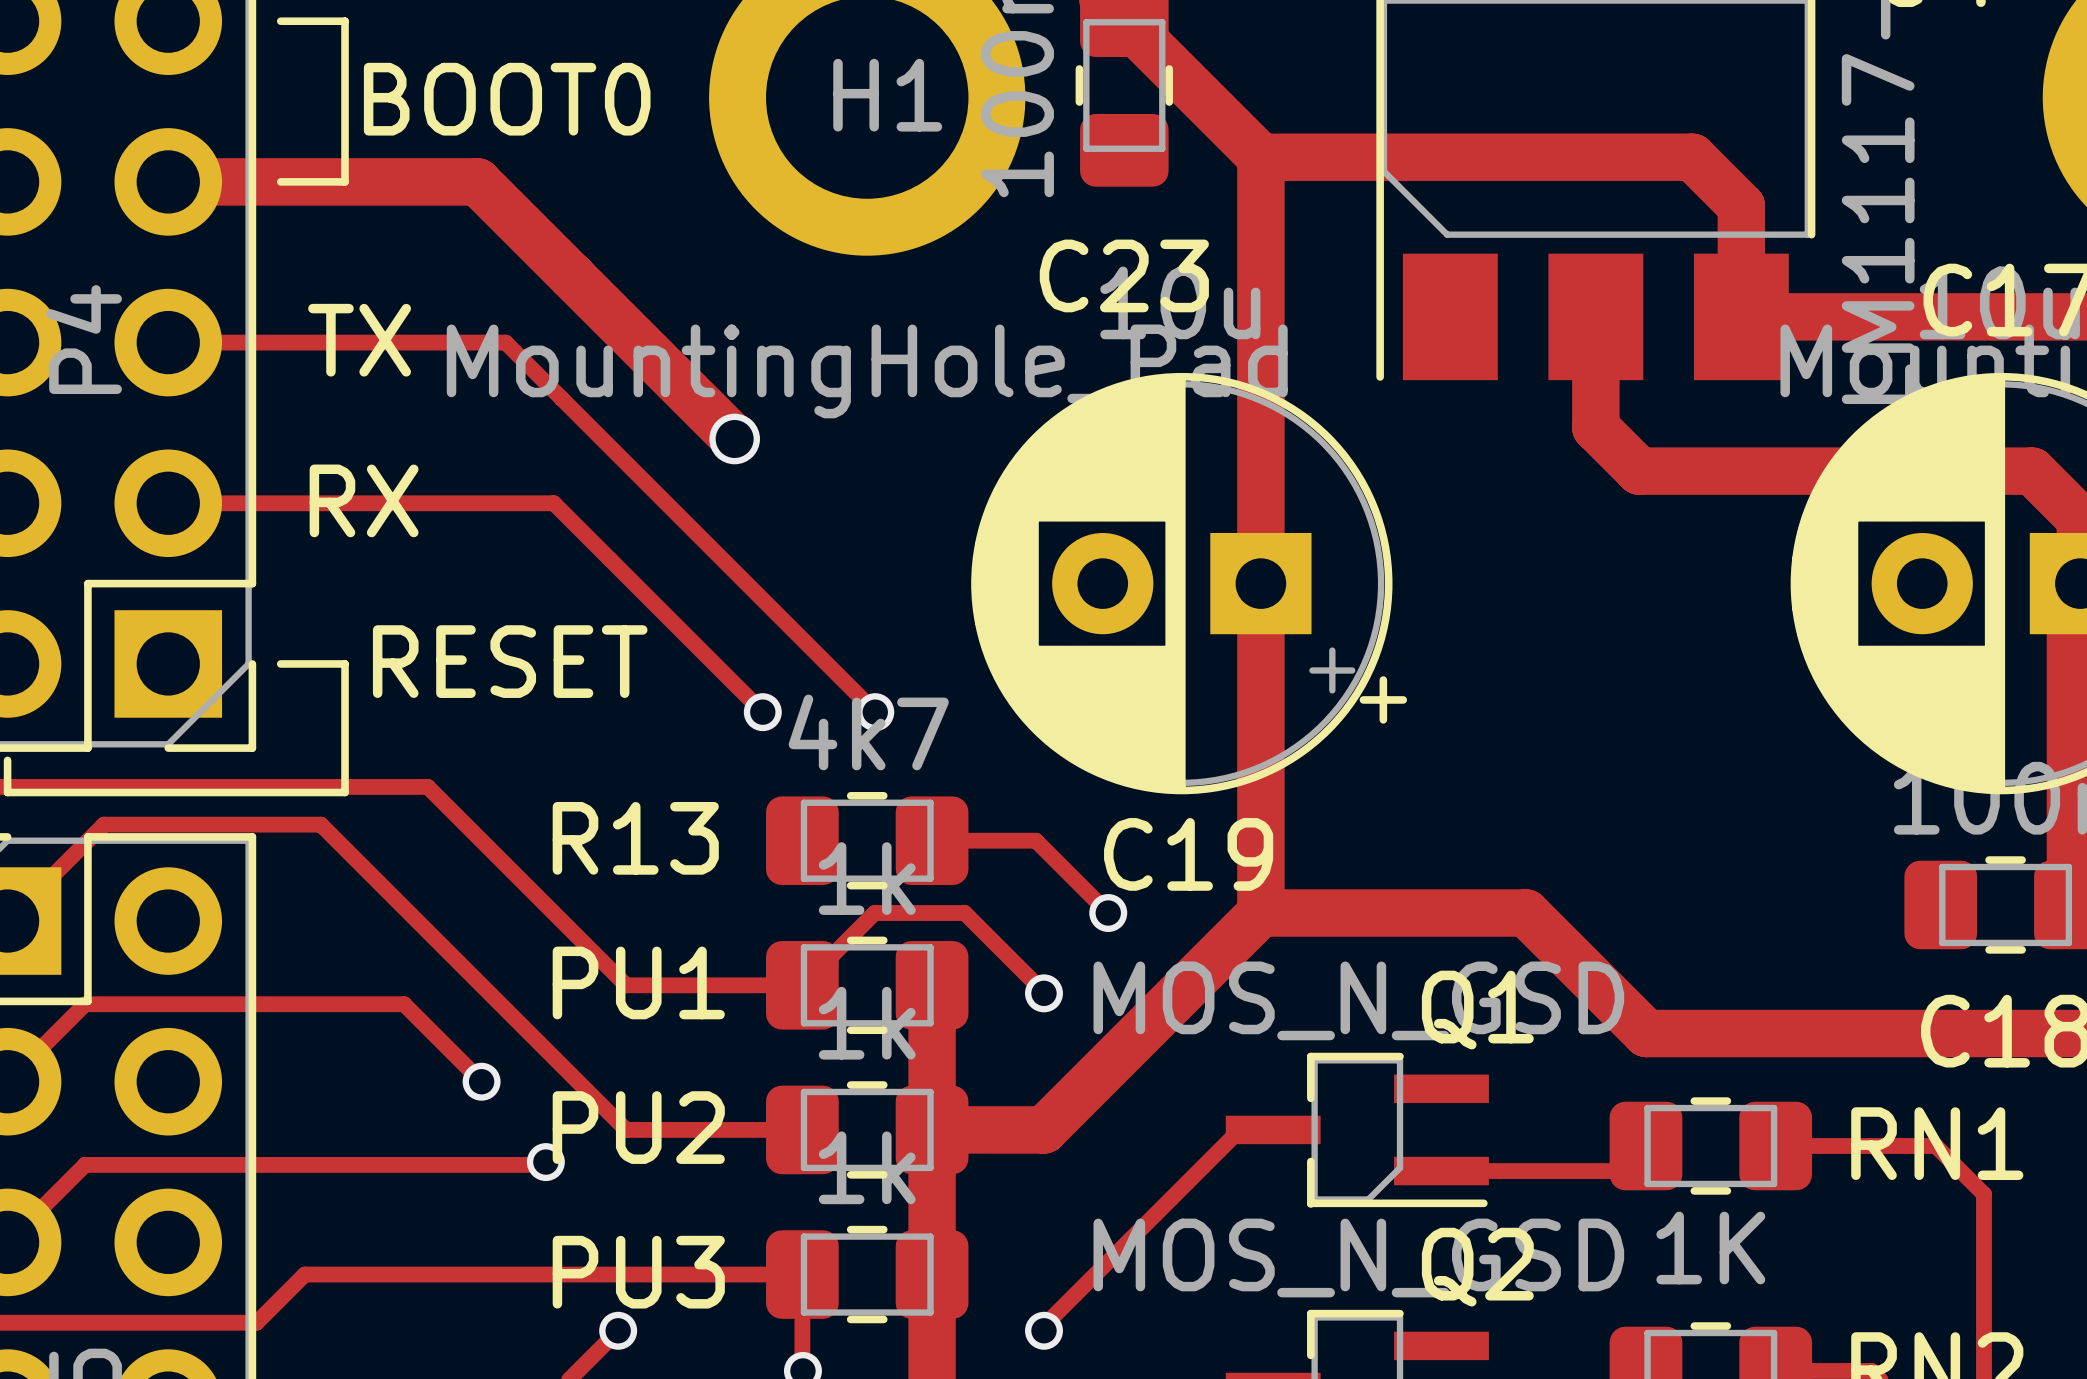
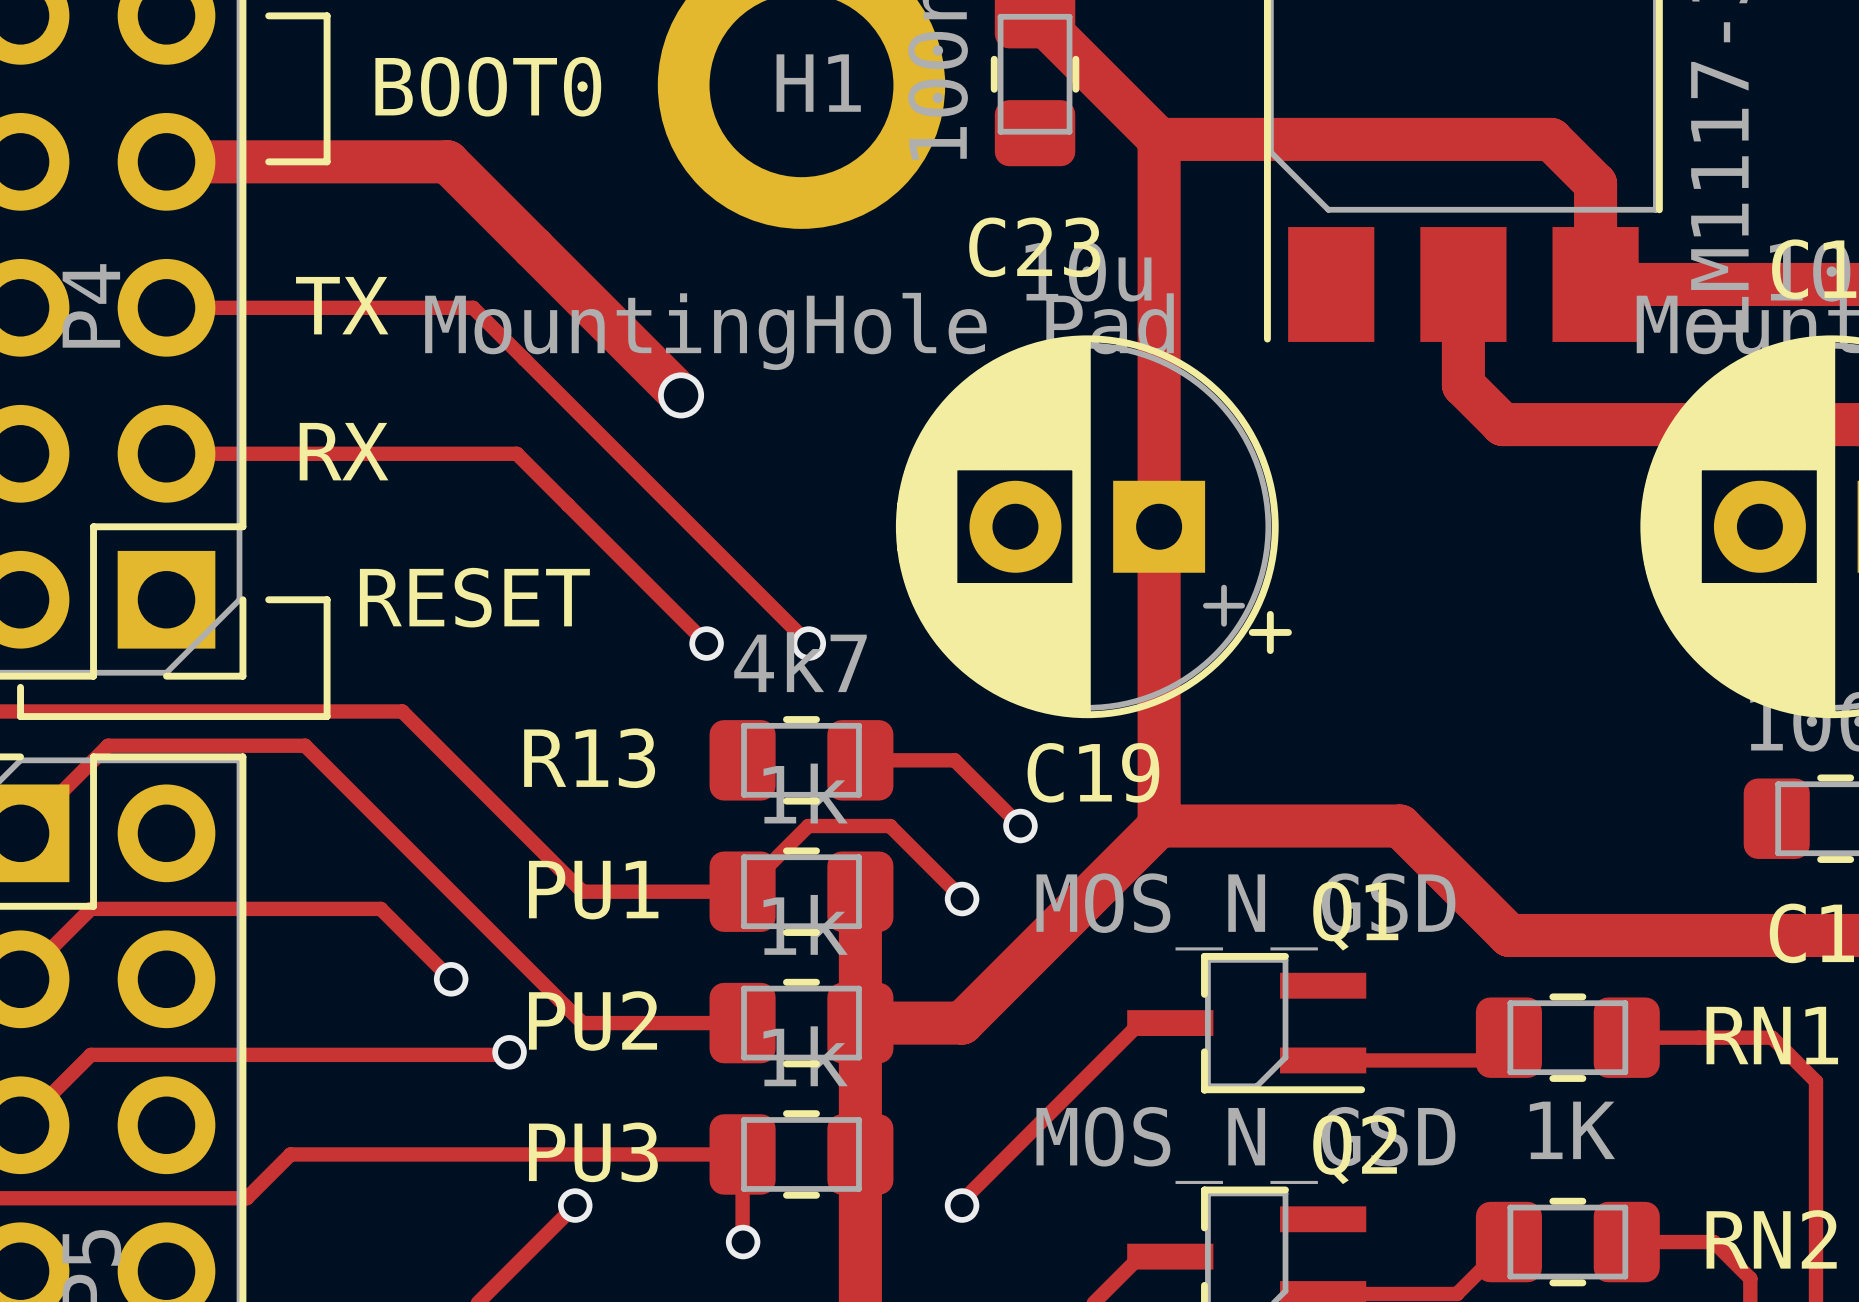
text position: BOOT0 (507, 99) -> BOOT0 (488, 86)

